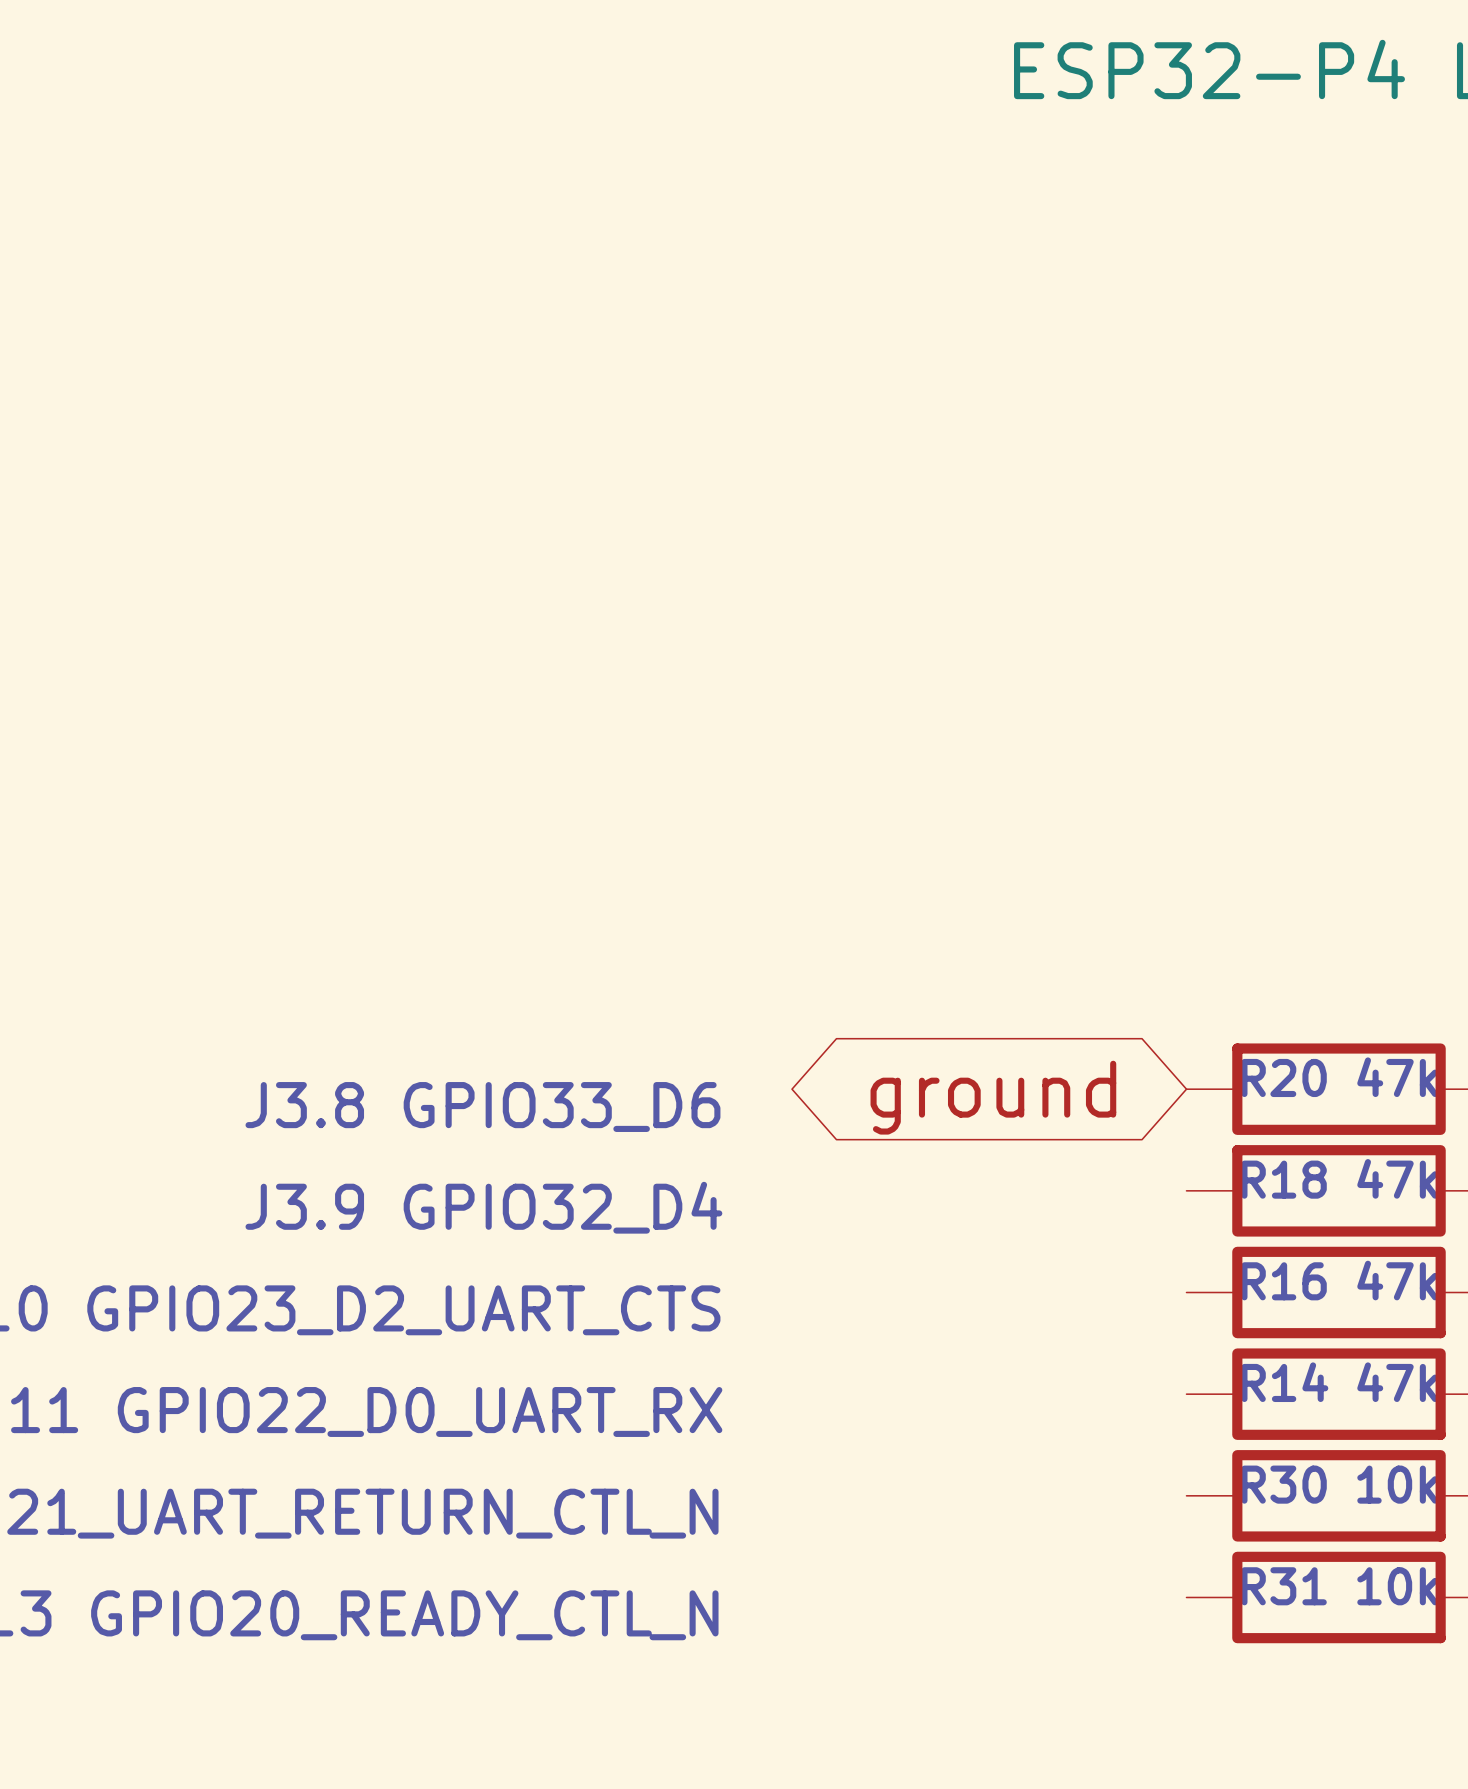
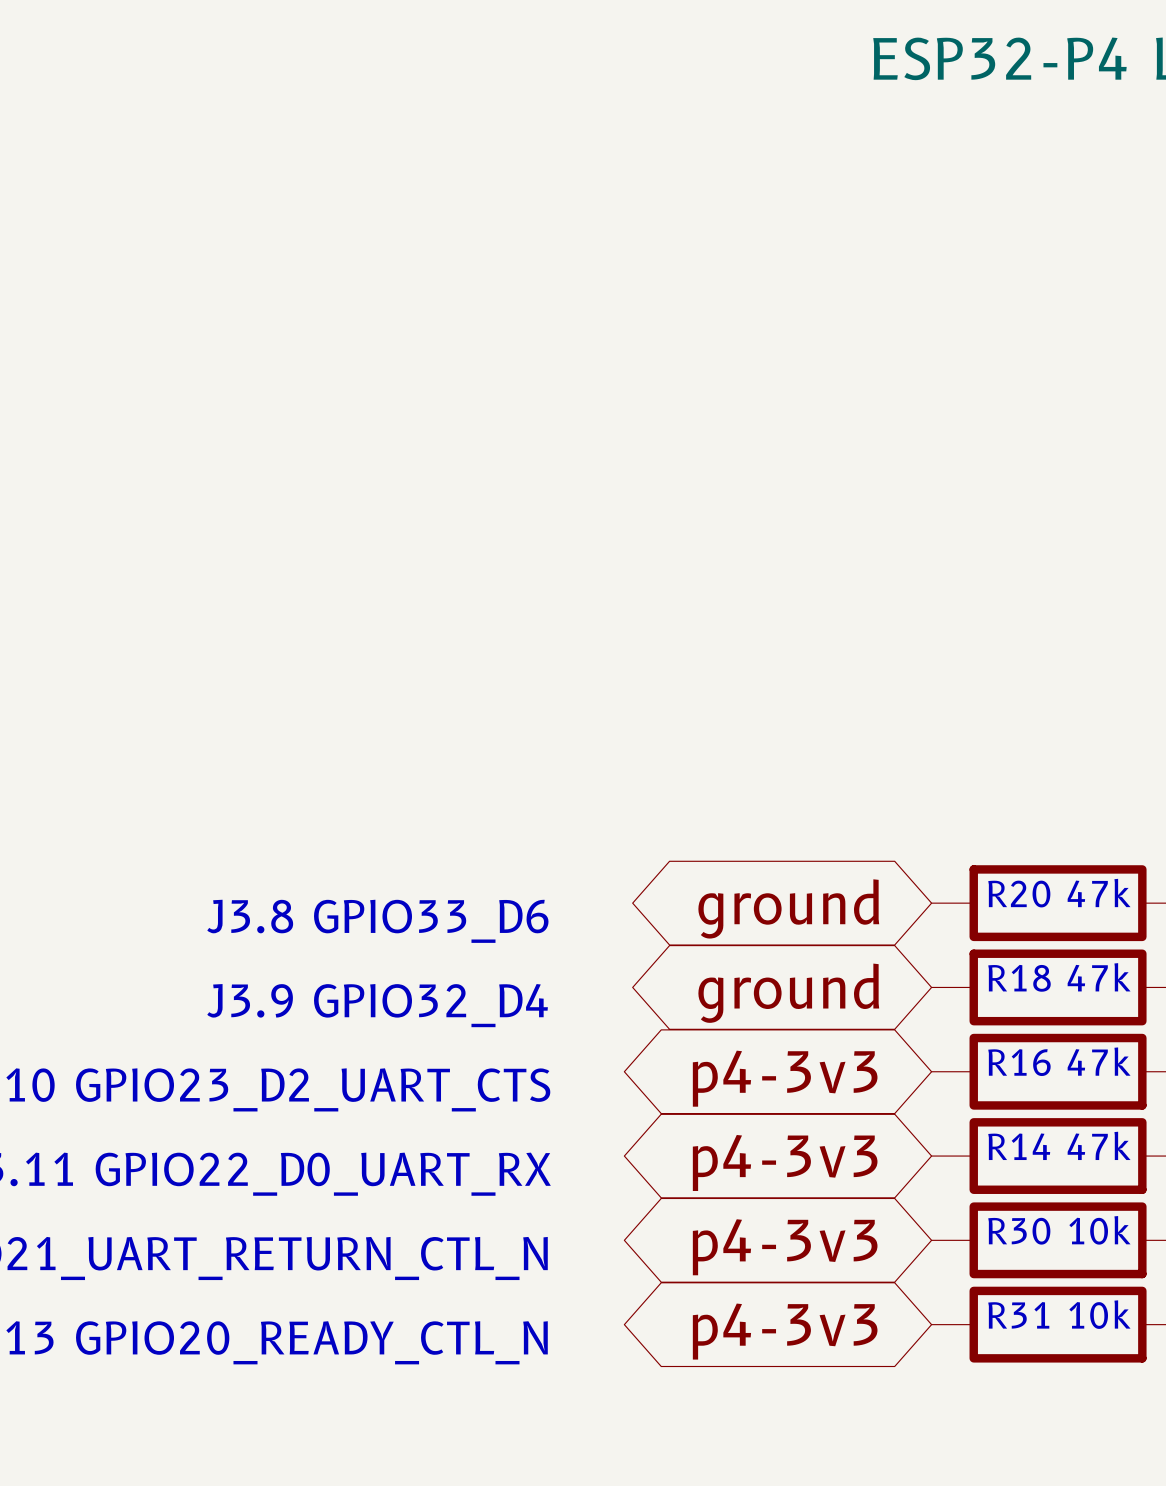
global label: none -> ground (788, 993)
global label: none -> p4-3v3 (785, 1078)
global label: none -> p4-3v3 (785, 1162)
global label: none -> p4-3v3 (785, 1247)
global label: none -> p4-3v3 (785, 1331)

